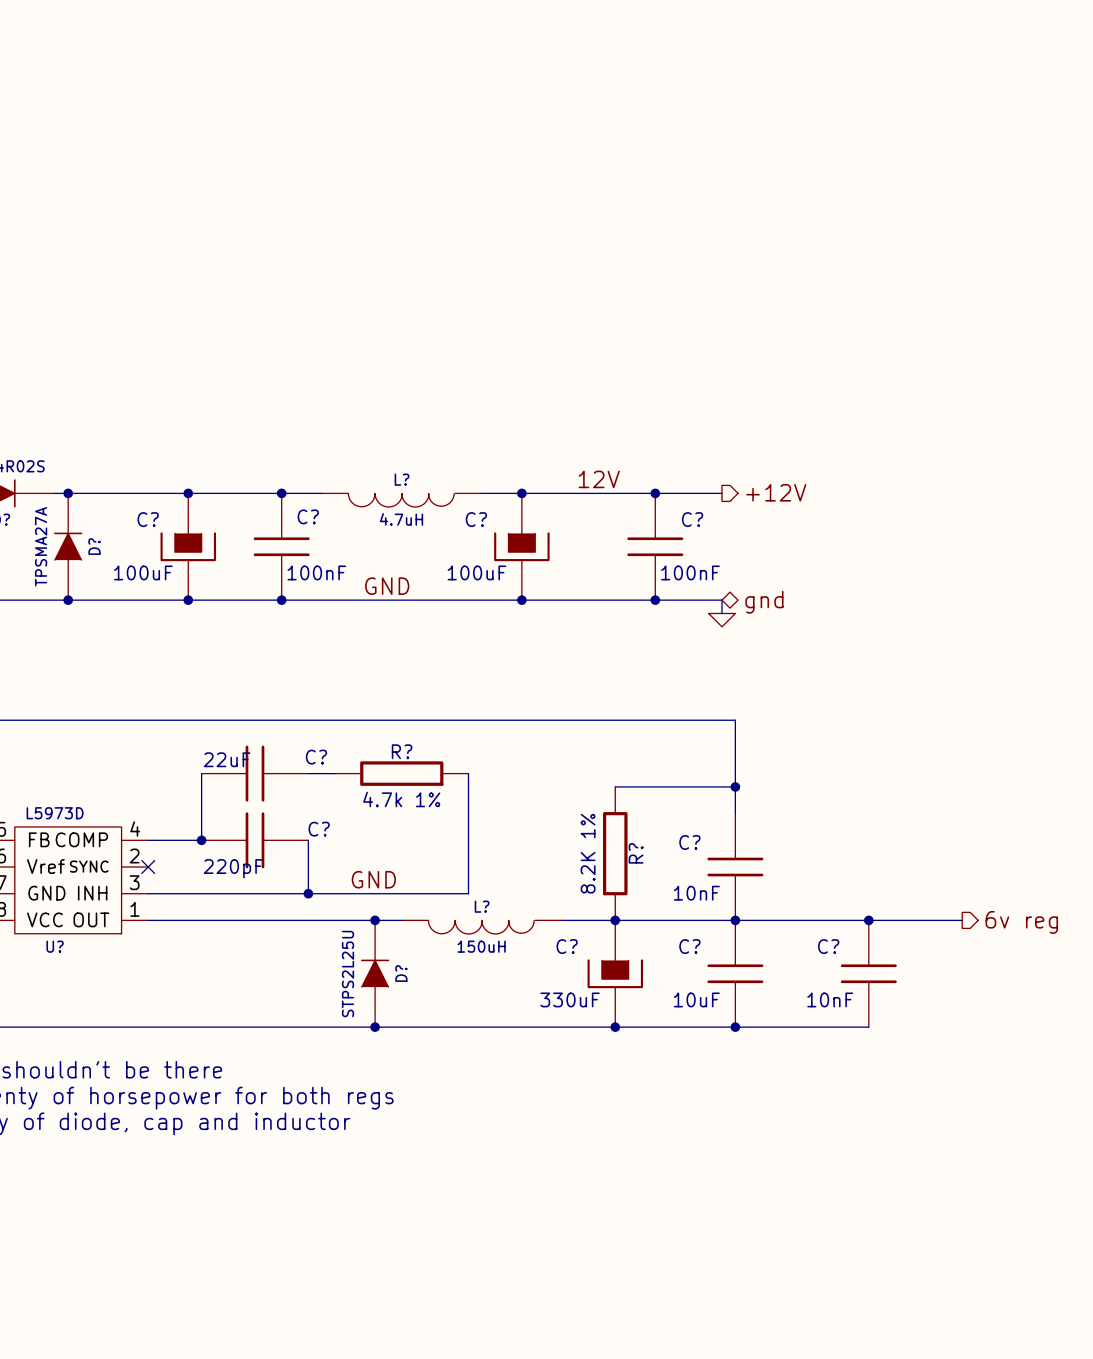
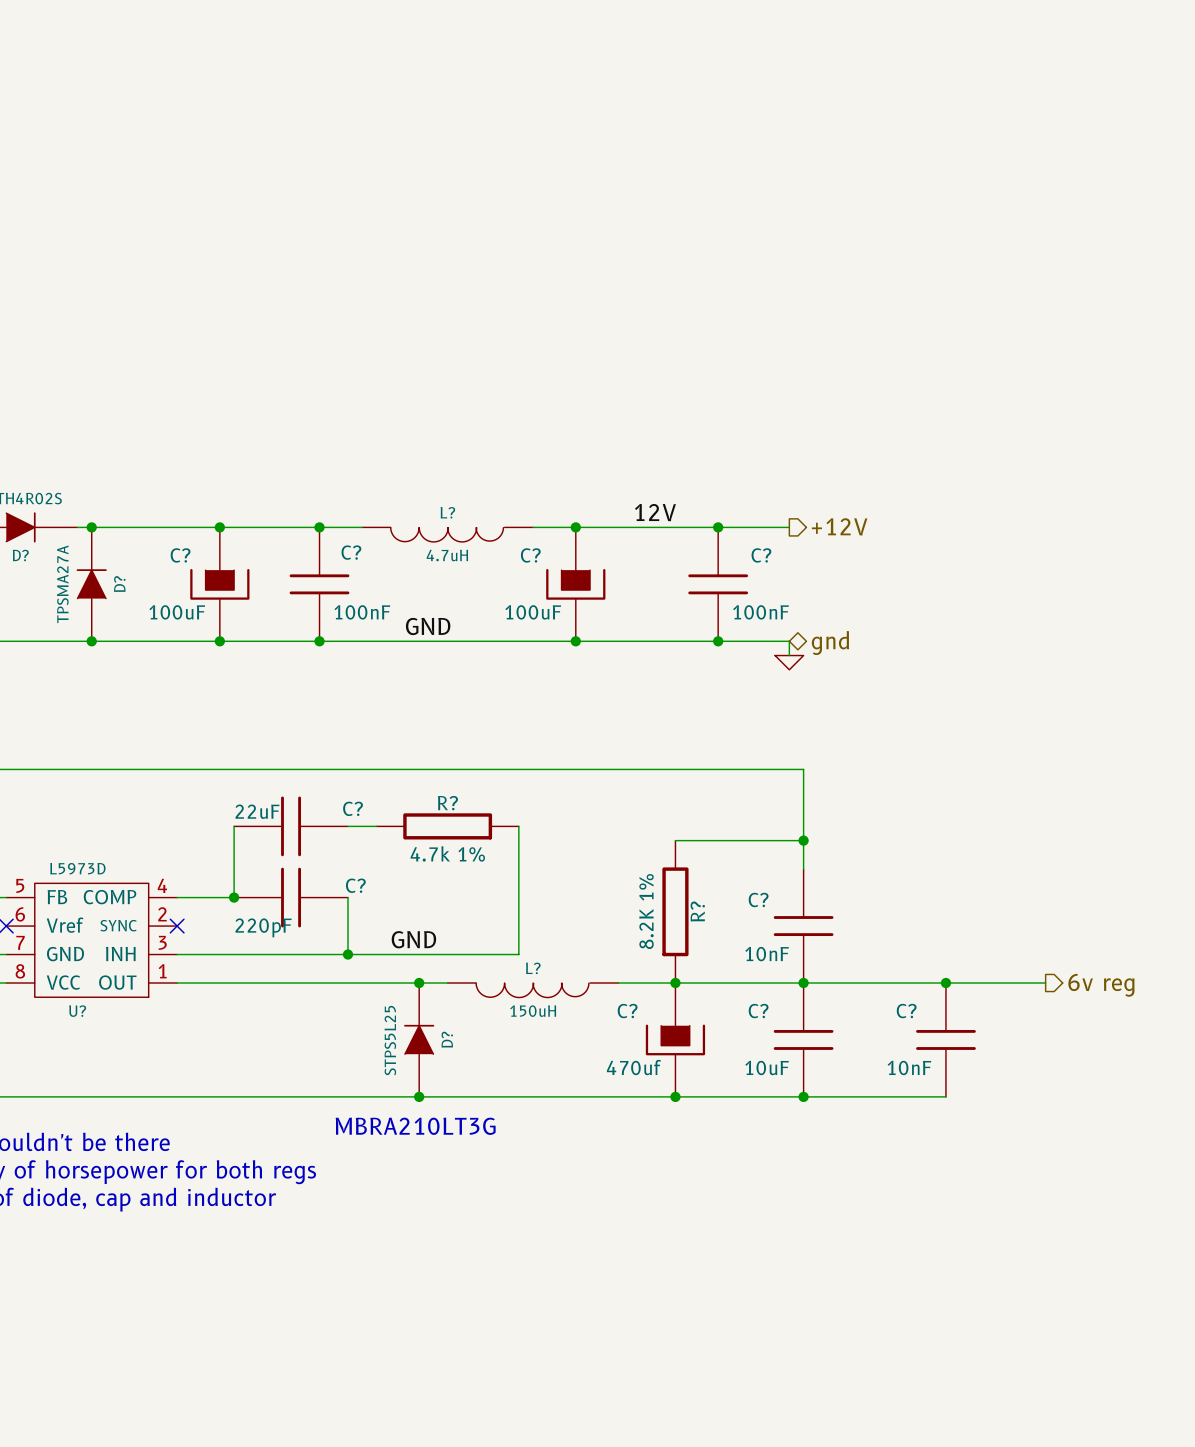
D? value: STPS2L25U (348, 974) -> STPS5L25 (390, 1040)
C? value: 330uF (570, 999) -> 470uf (633, 1067)
text: none -> MBRA210LT3G (415, 1126)

